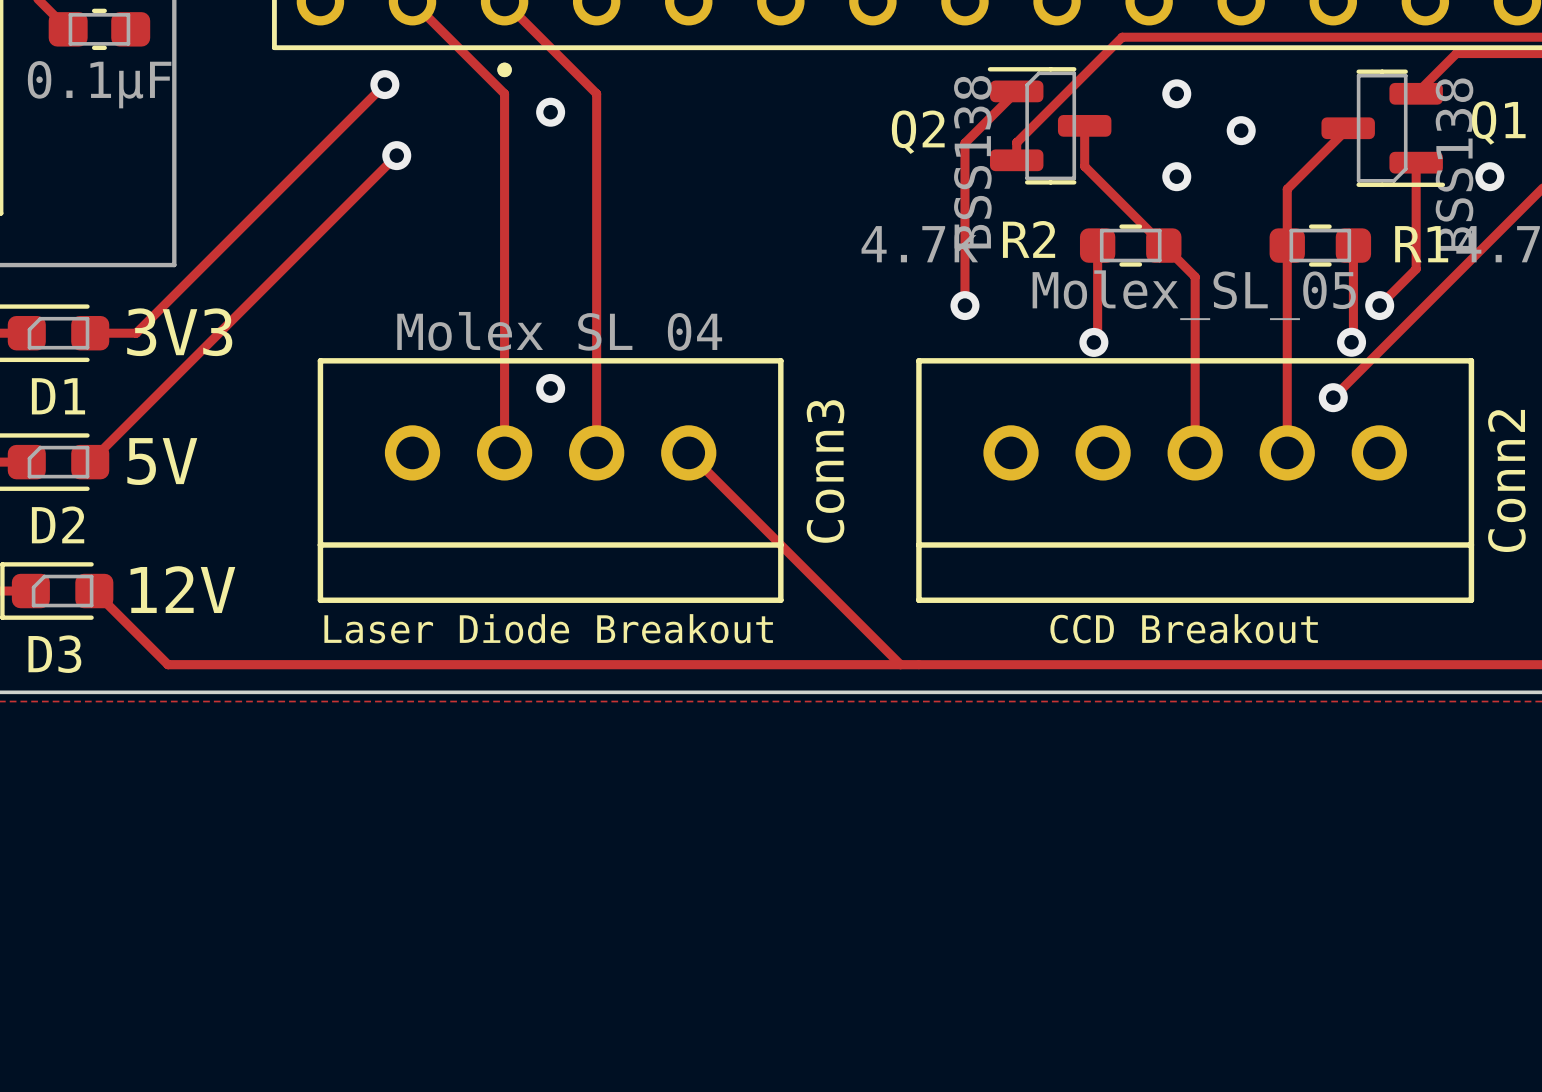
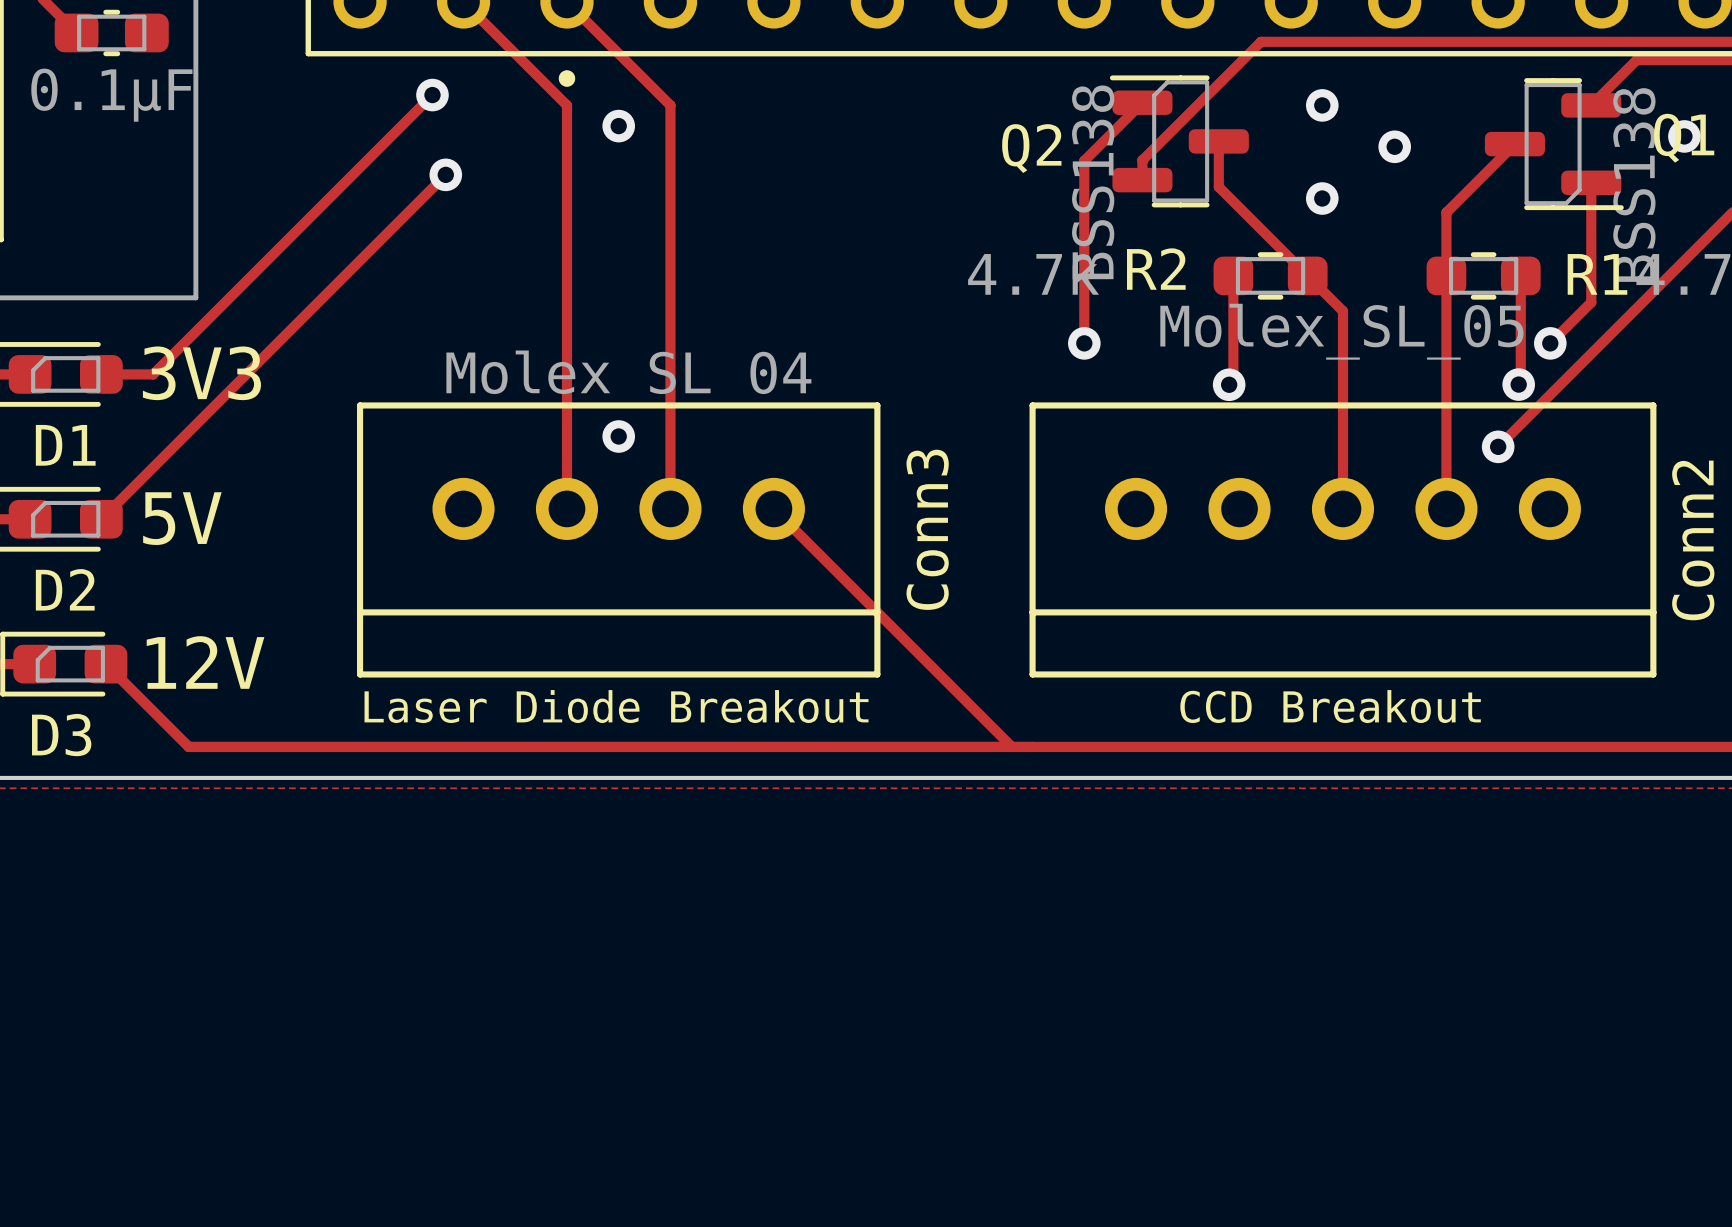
via position: (1489, 176) -> (1684, 136)

